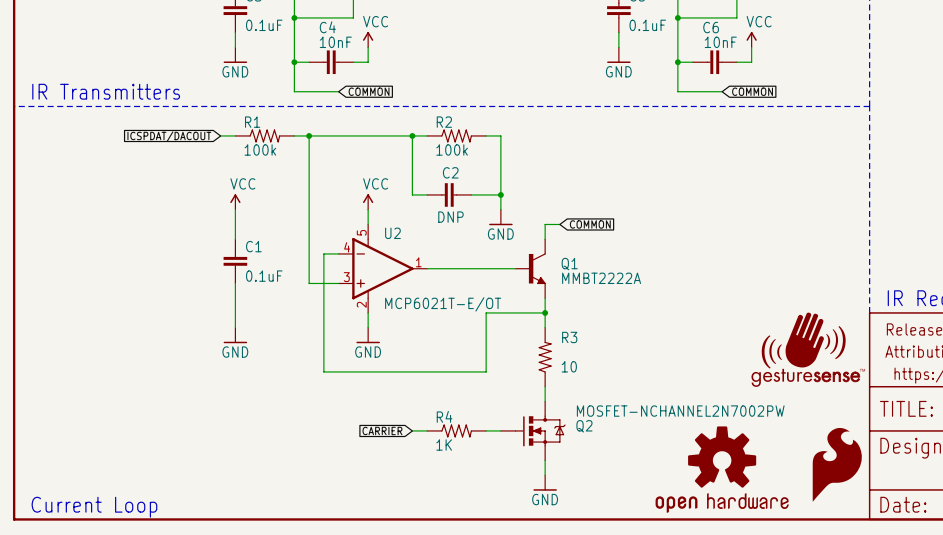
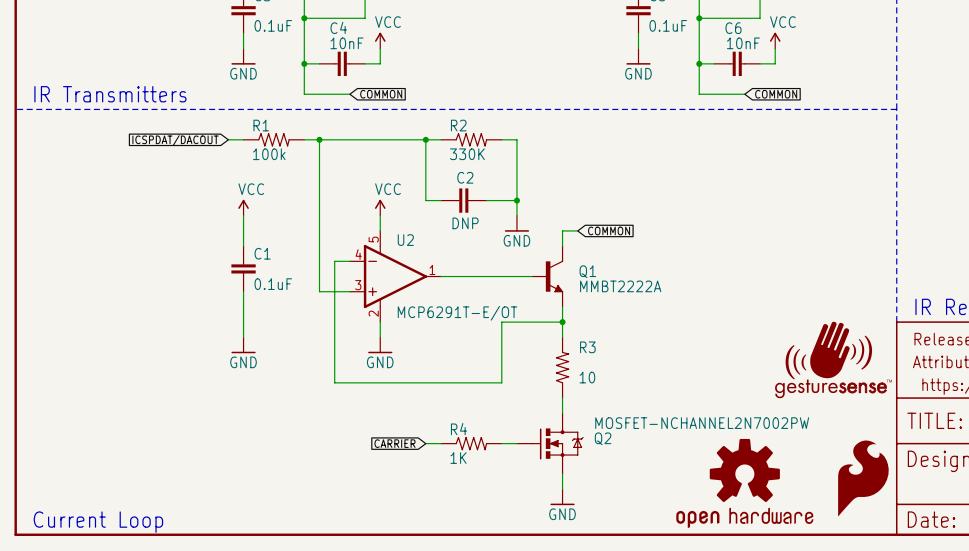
R2 value: 100k (452, 149) -> 330K (467, 154)
U2 value: MCP6021T-E/OT (443, 304) -> MCP6291T-E/OT (457, 313)

